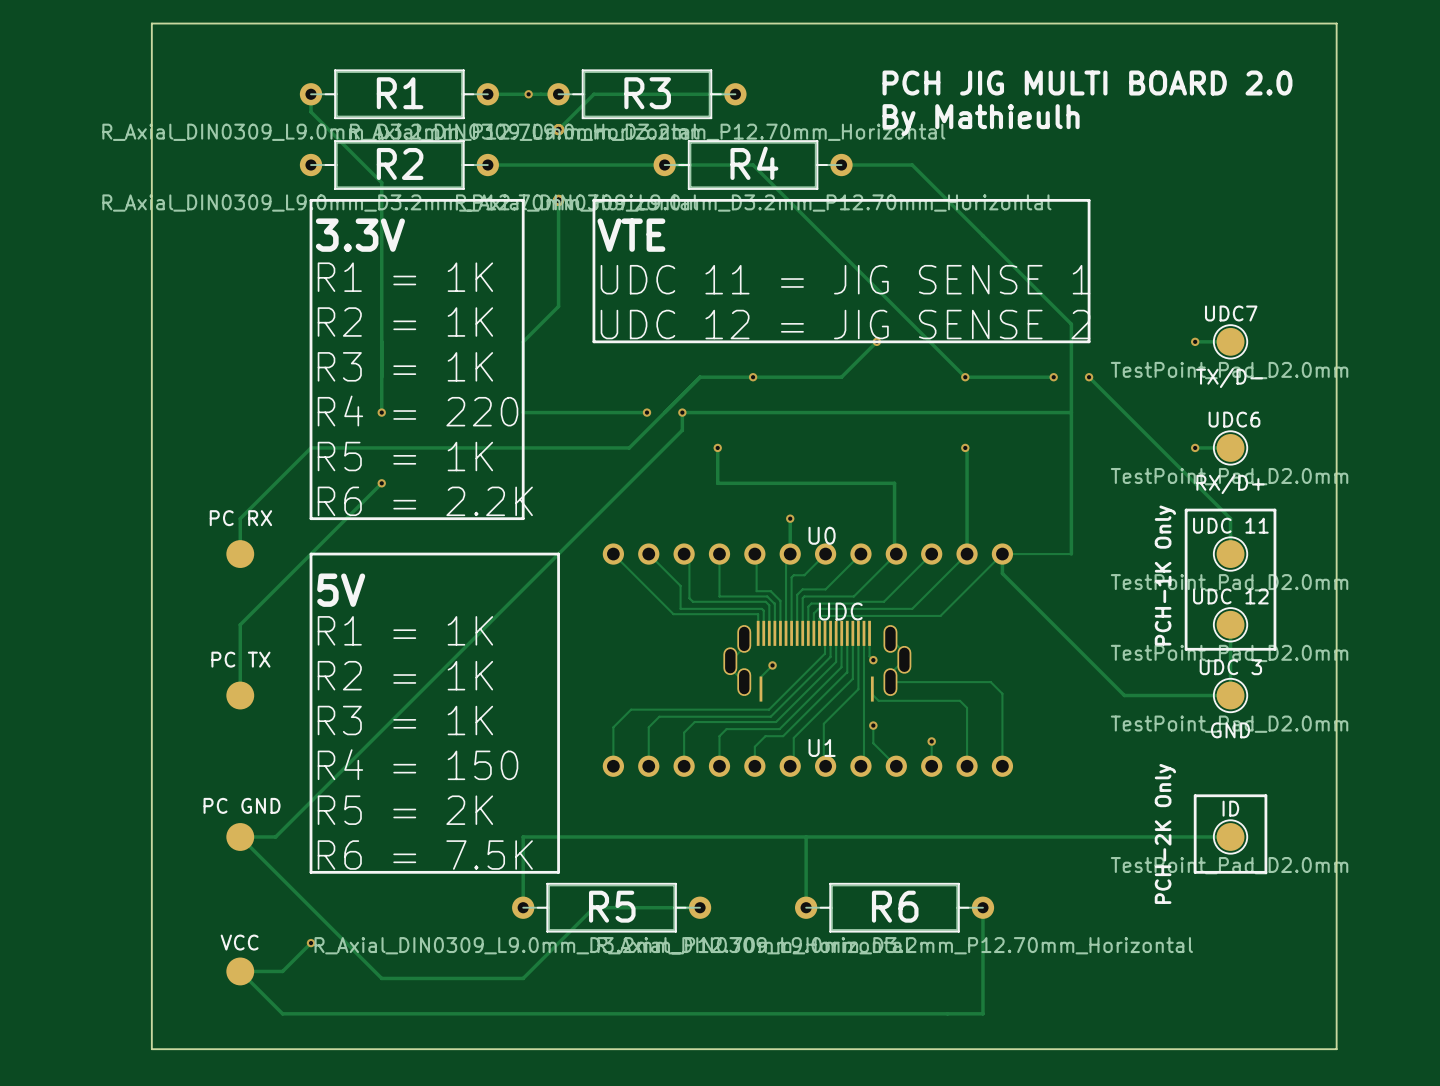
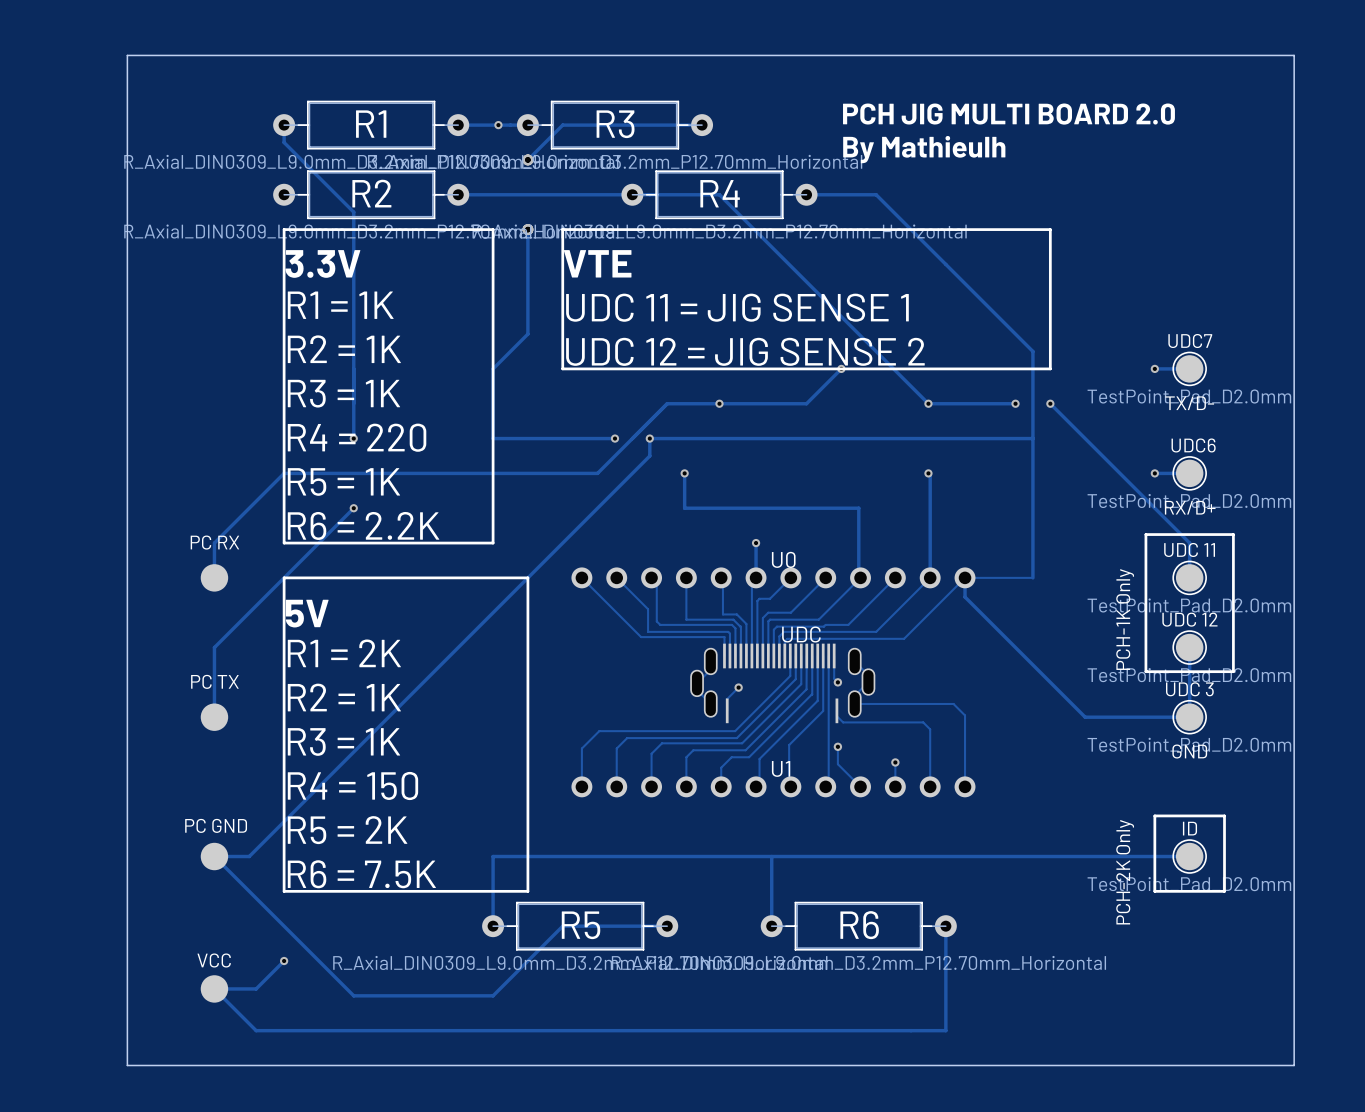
text: R1 = 1K (405, 630) -> R1 = 2K (344, 653)

